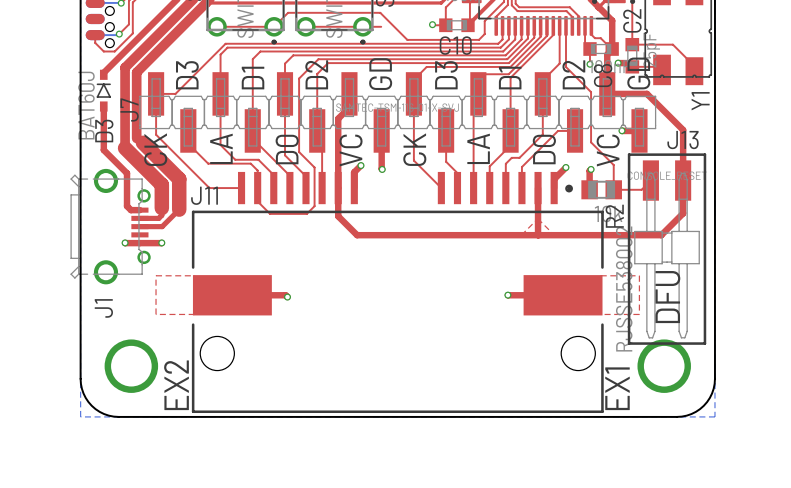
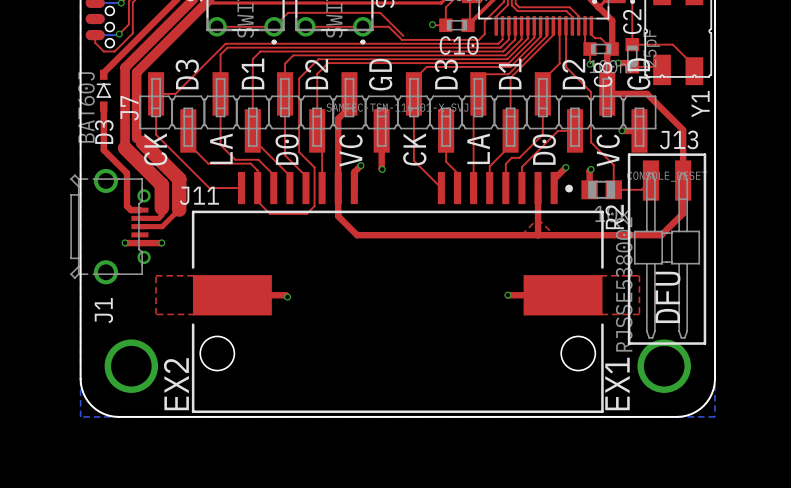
top track: (403, 36) (407, 39) -> (381, 26) (388, 26) (401, 39) (407, 39)

